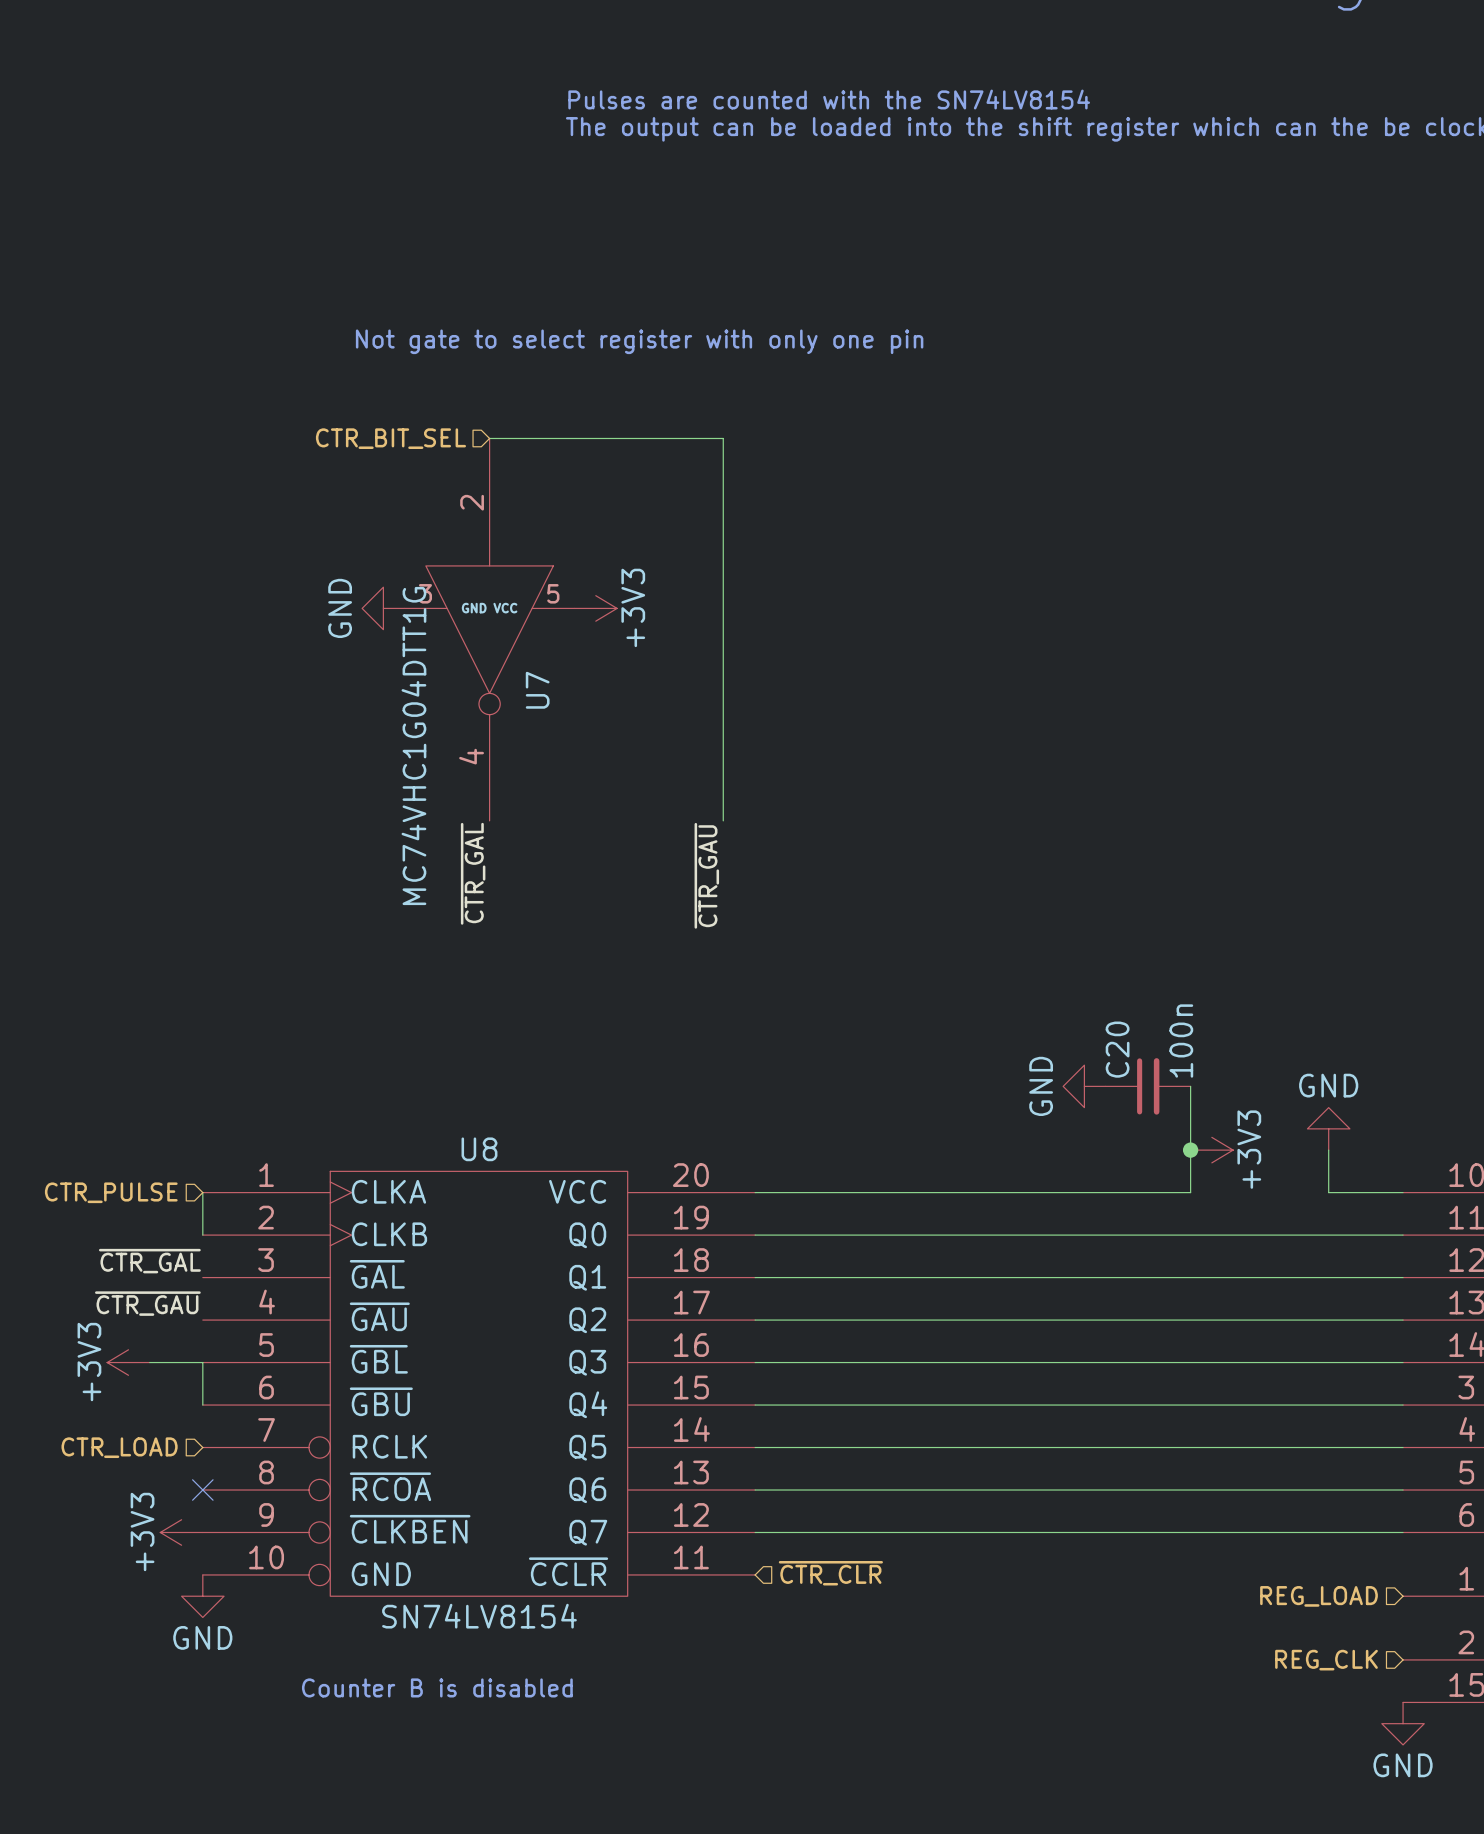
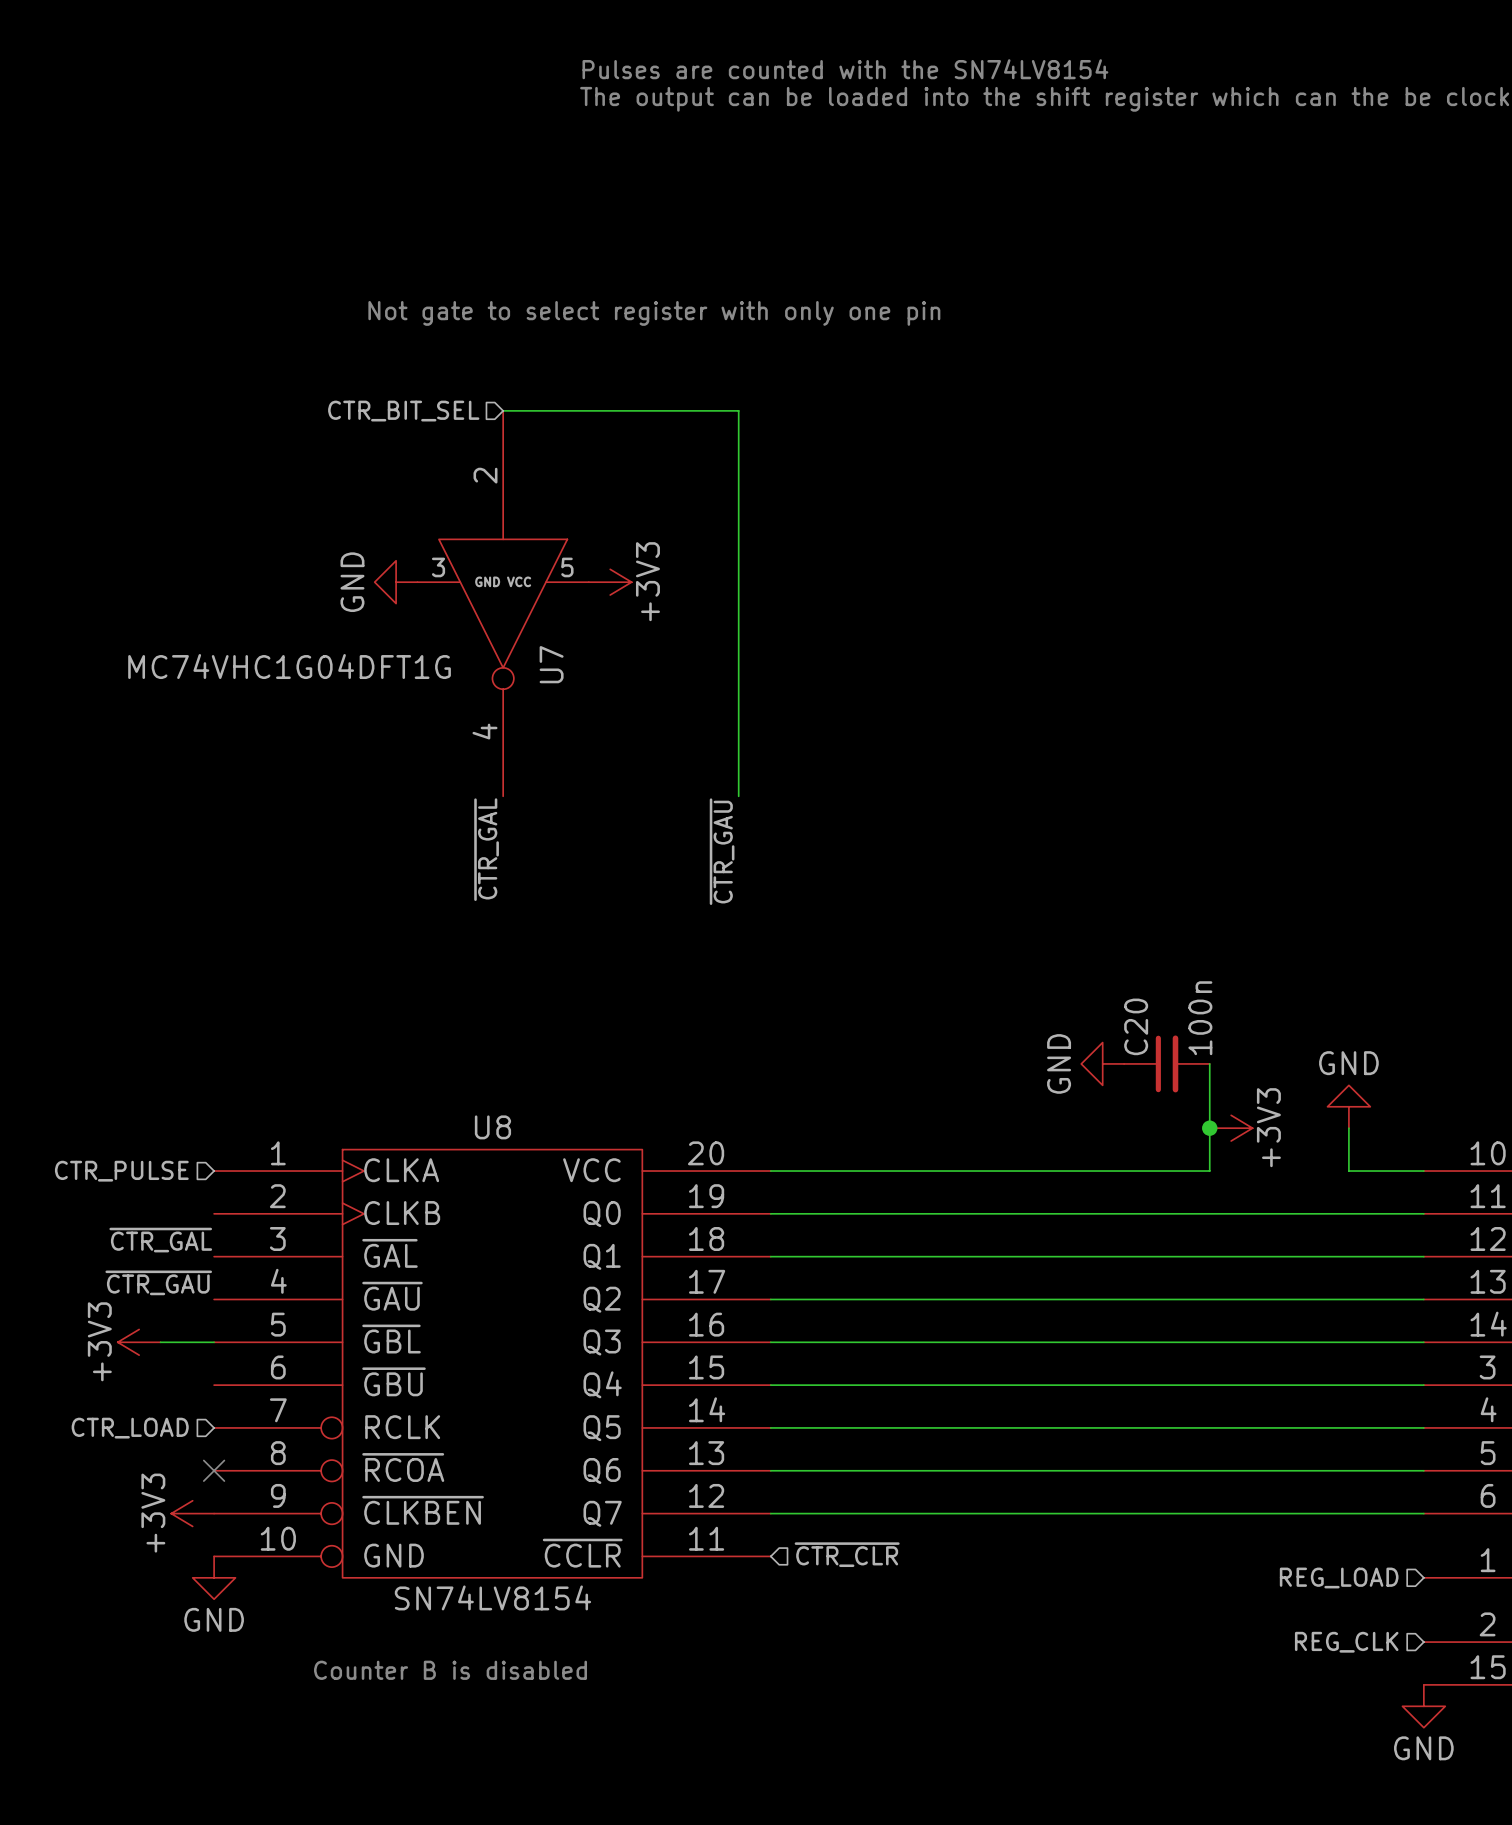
U7 value: MC74VHC1G04DTT1G (413, 746) -> MC74VHC1G04DFT1G (289, 666)
wire: (202, 1192) (202, 1235) -> none
wire: (202, 1362) (202, 1405) -> none

